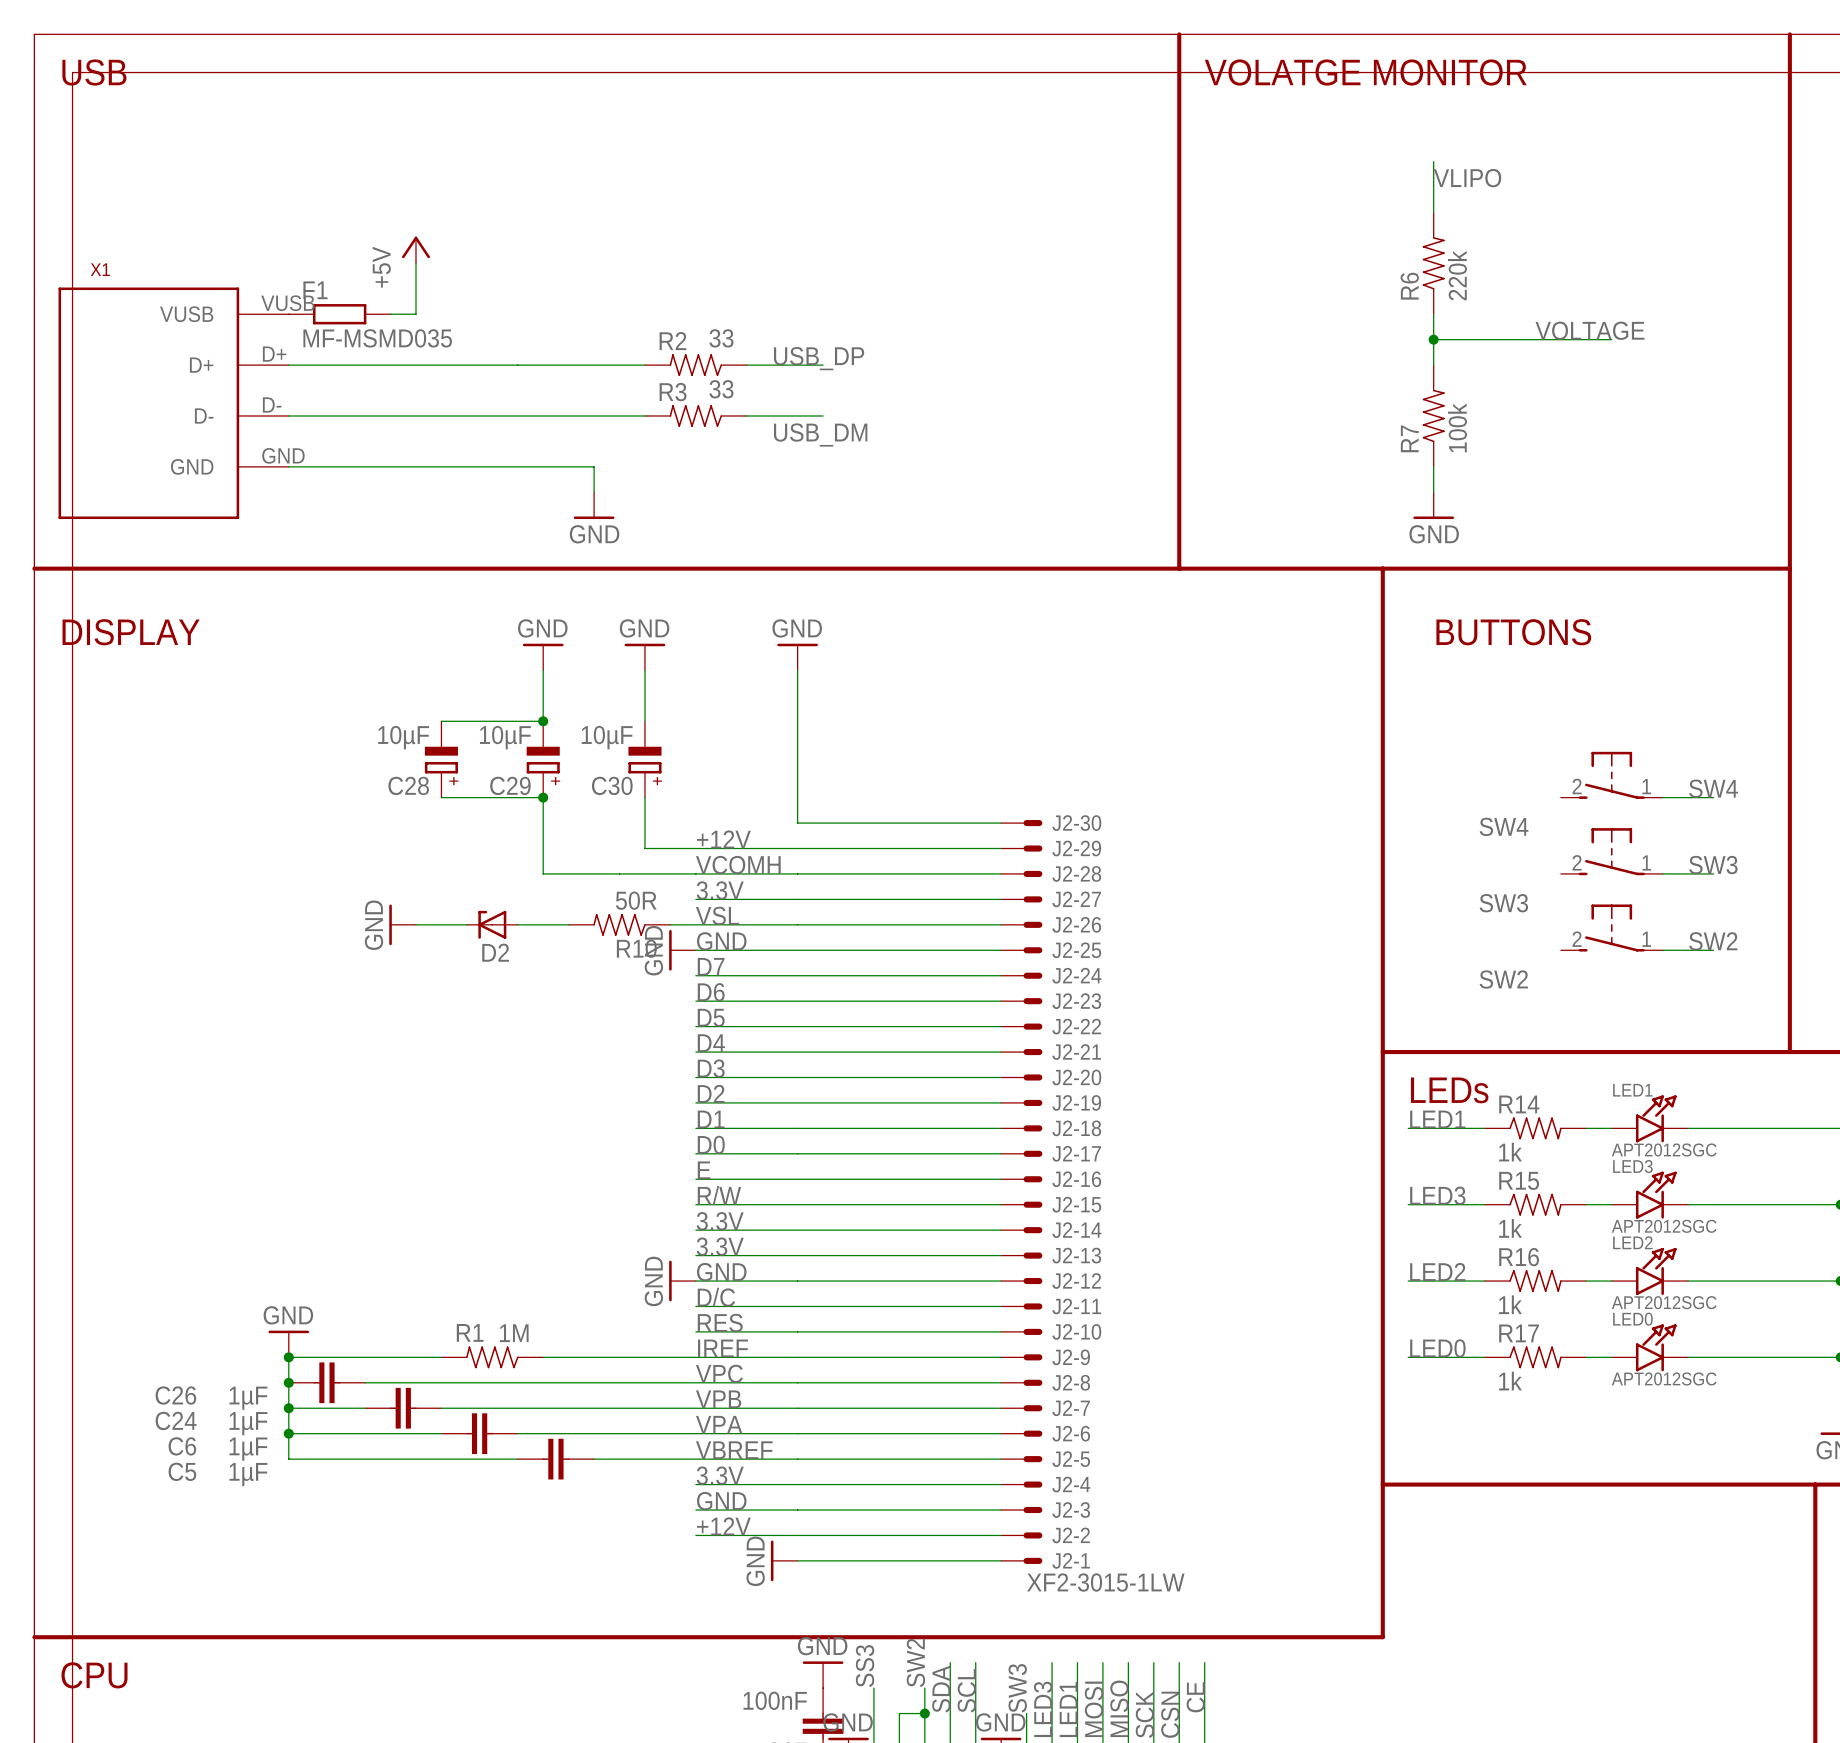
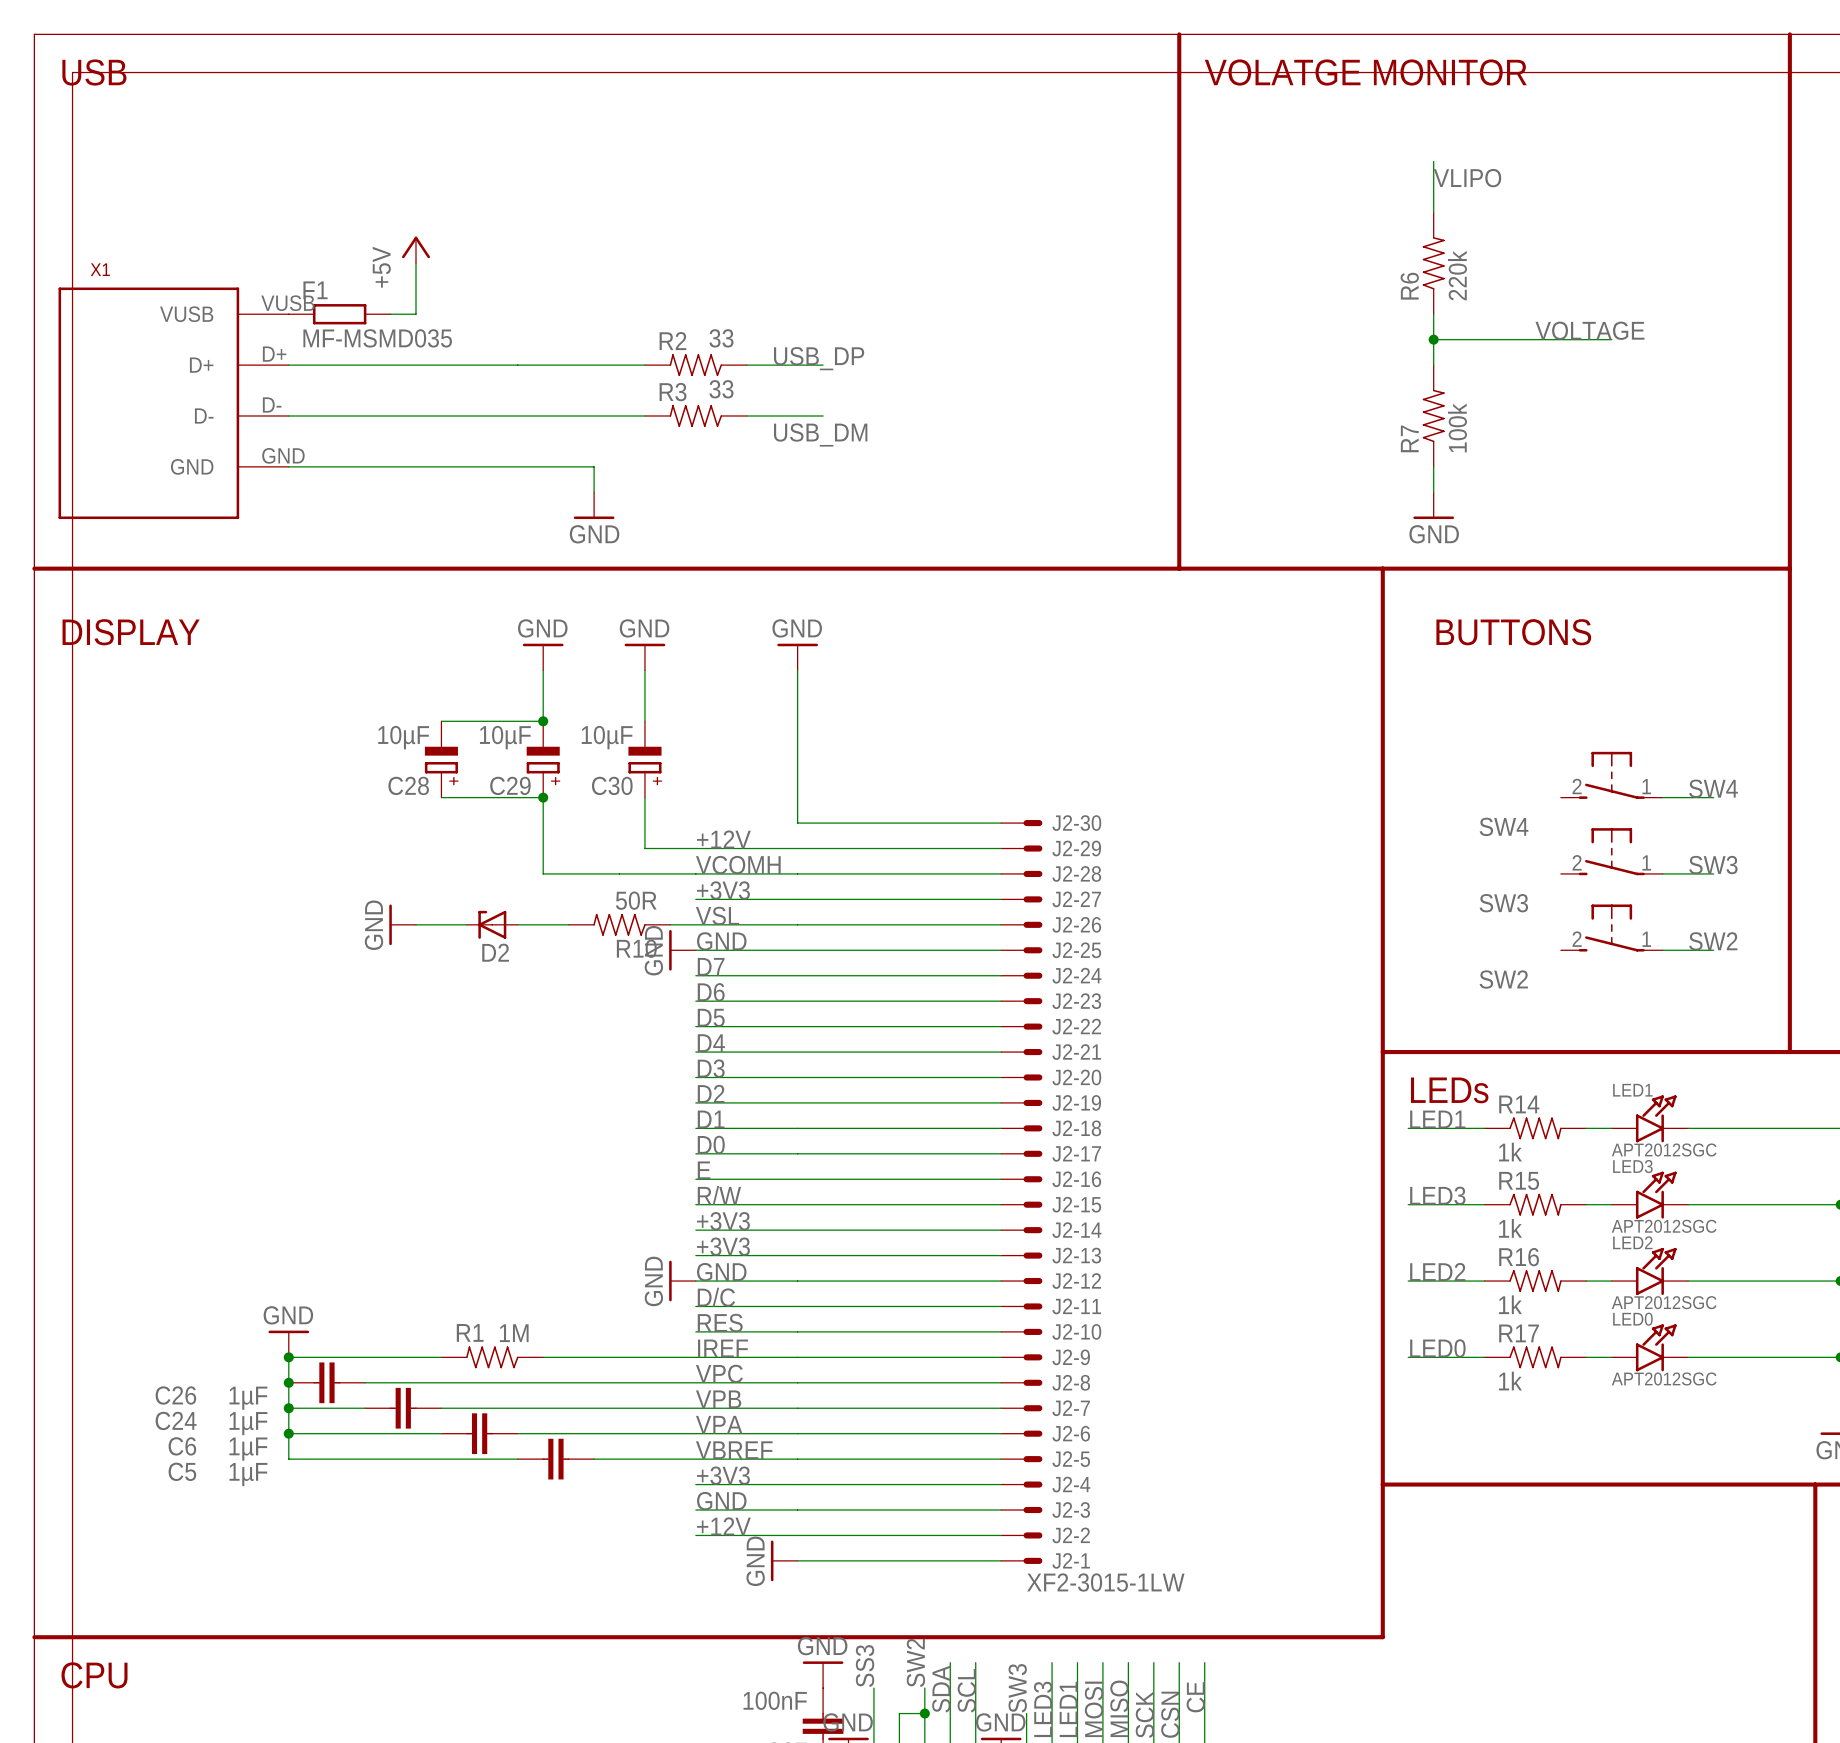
label: 3.3V (720, 890) -> +3V3 (723, 890)
label: 3.3V (720, 1221) -> +3V3 (723, 1221)
label: 3.3V (720, 1246) -> +3V3 (723, 1246)
label: 3.3V (720, 1475) -> +3V3 (723, 1475)

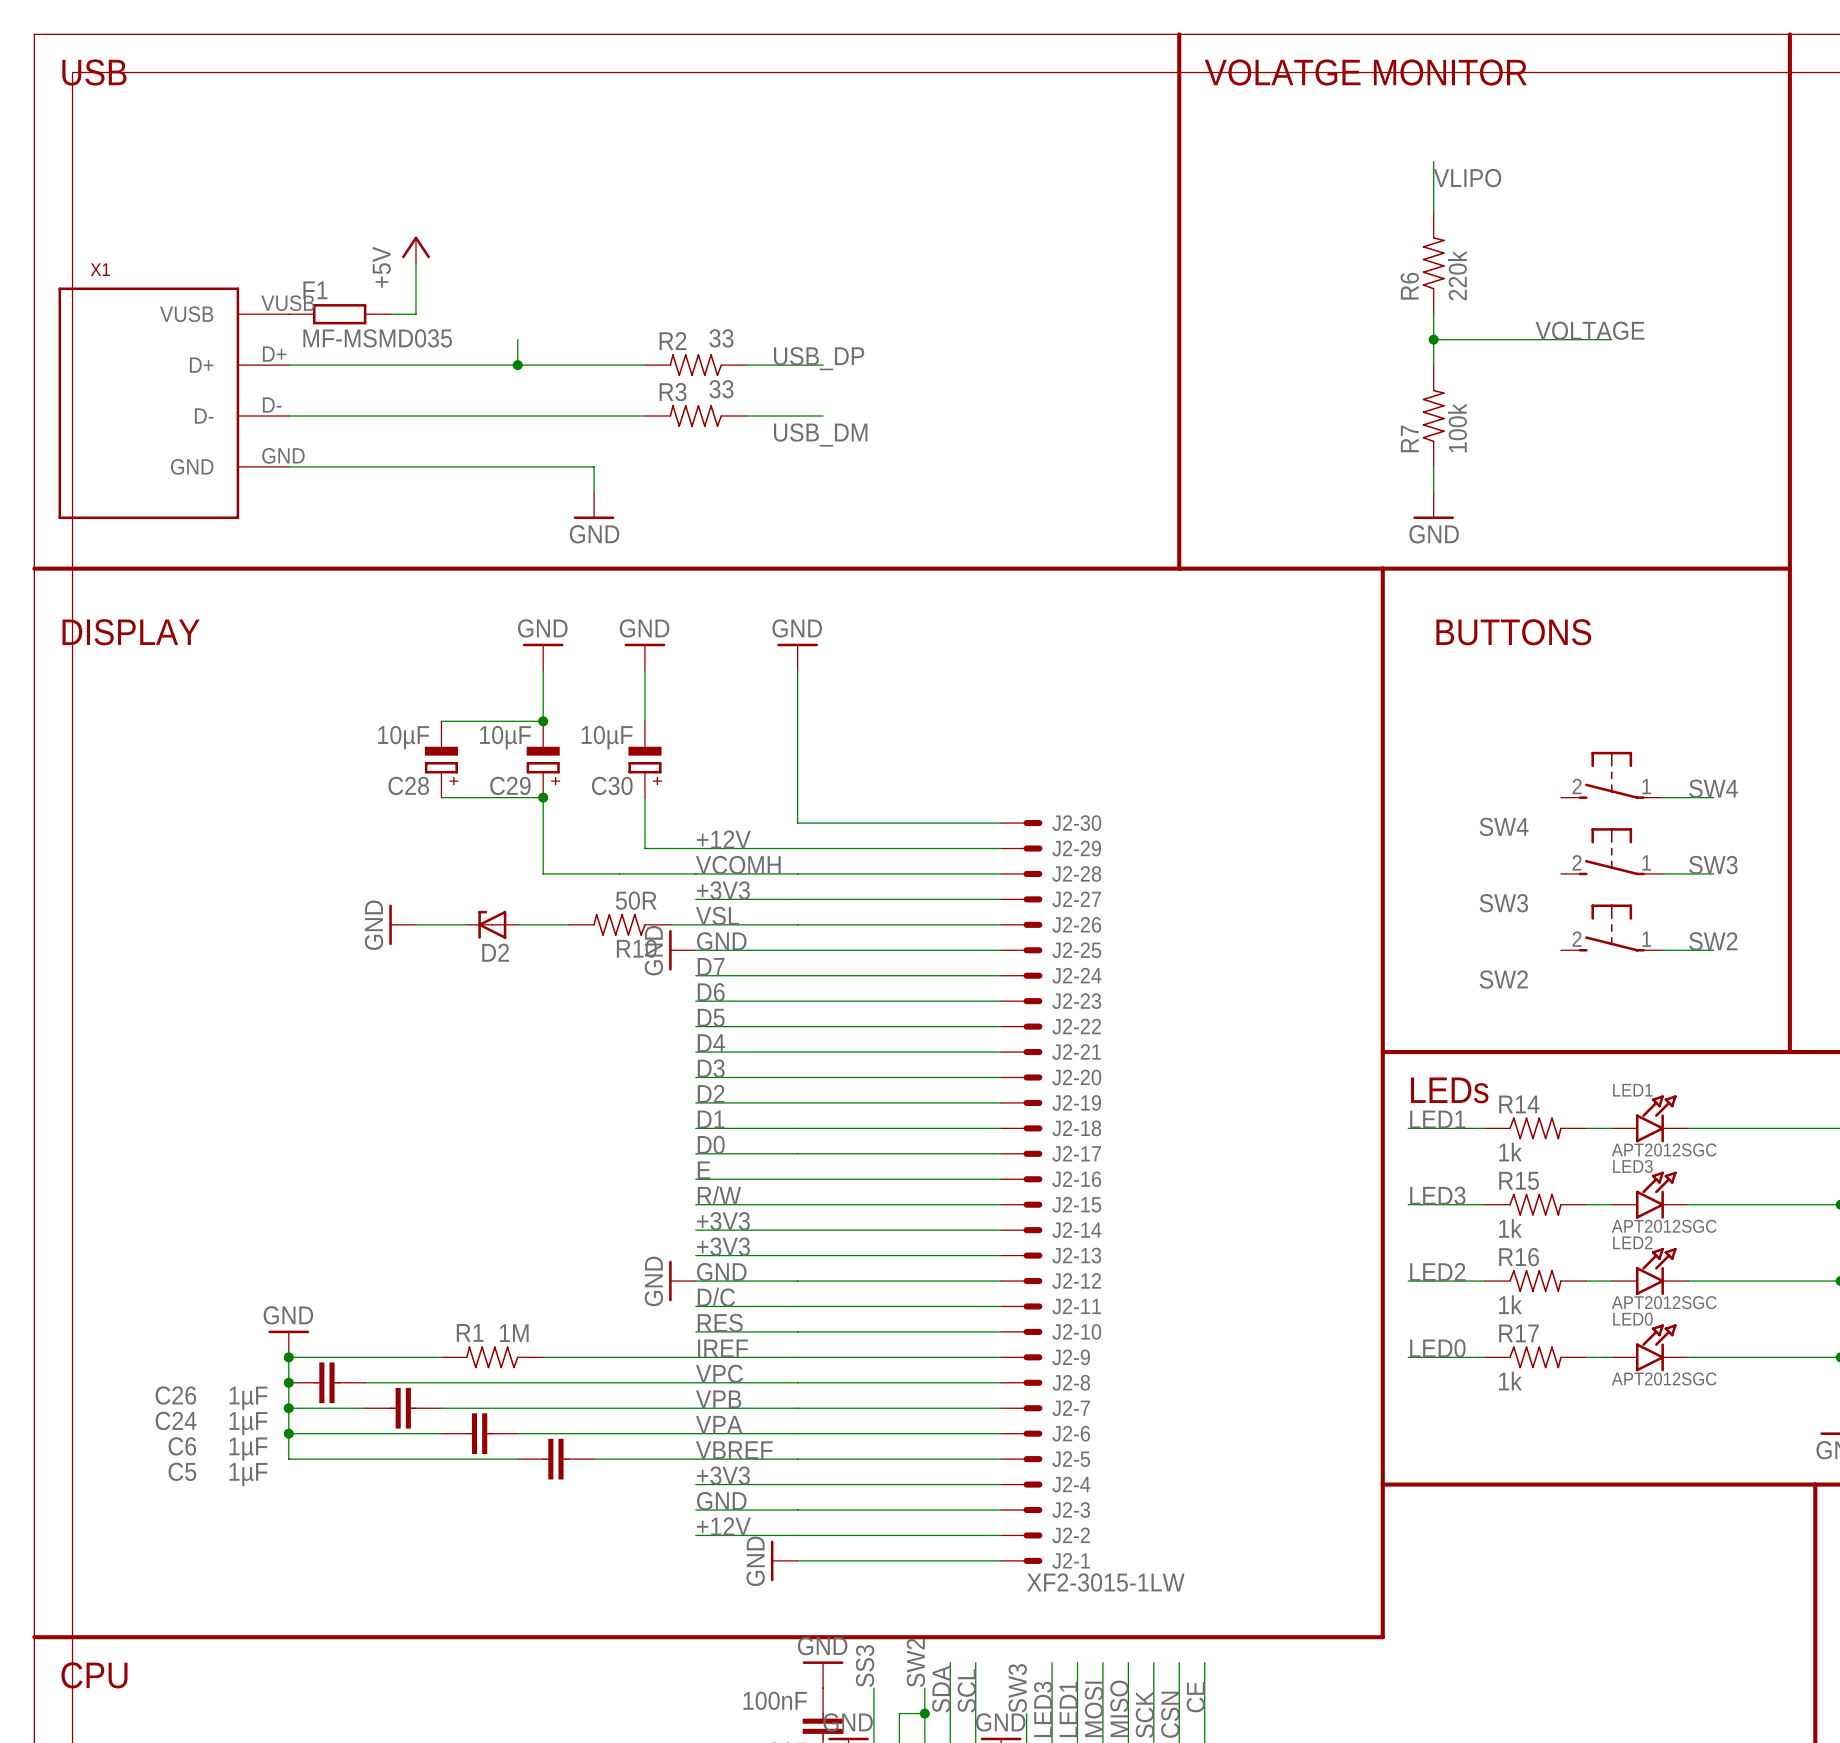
wire: none -> (517, 339) (517, 365)
junction: none -> (517, 365)

